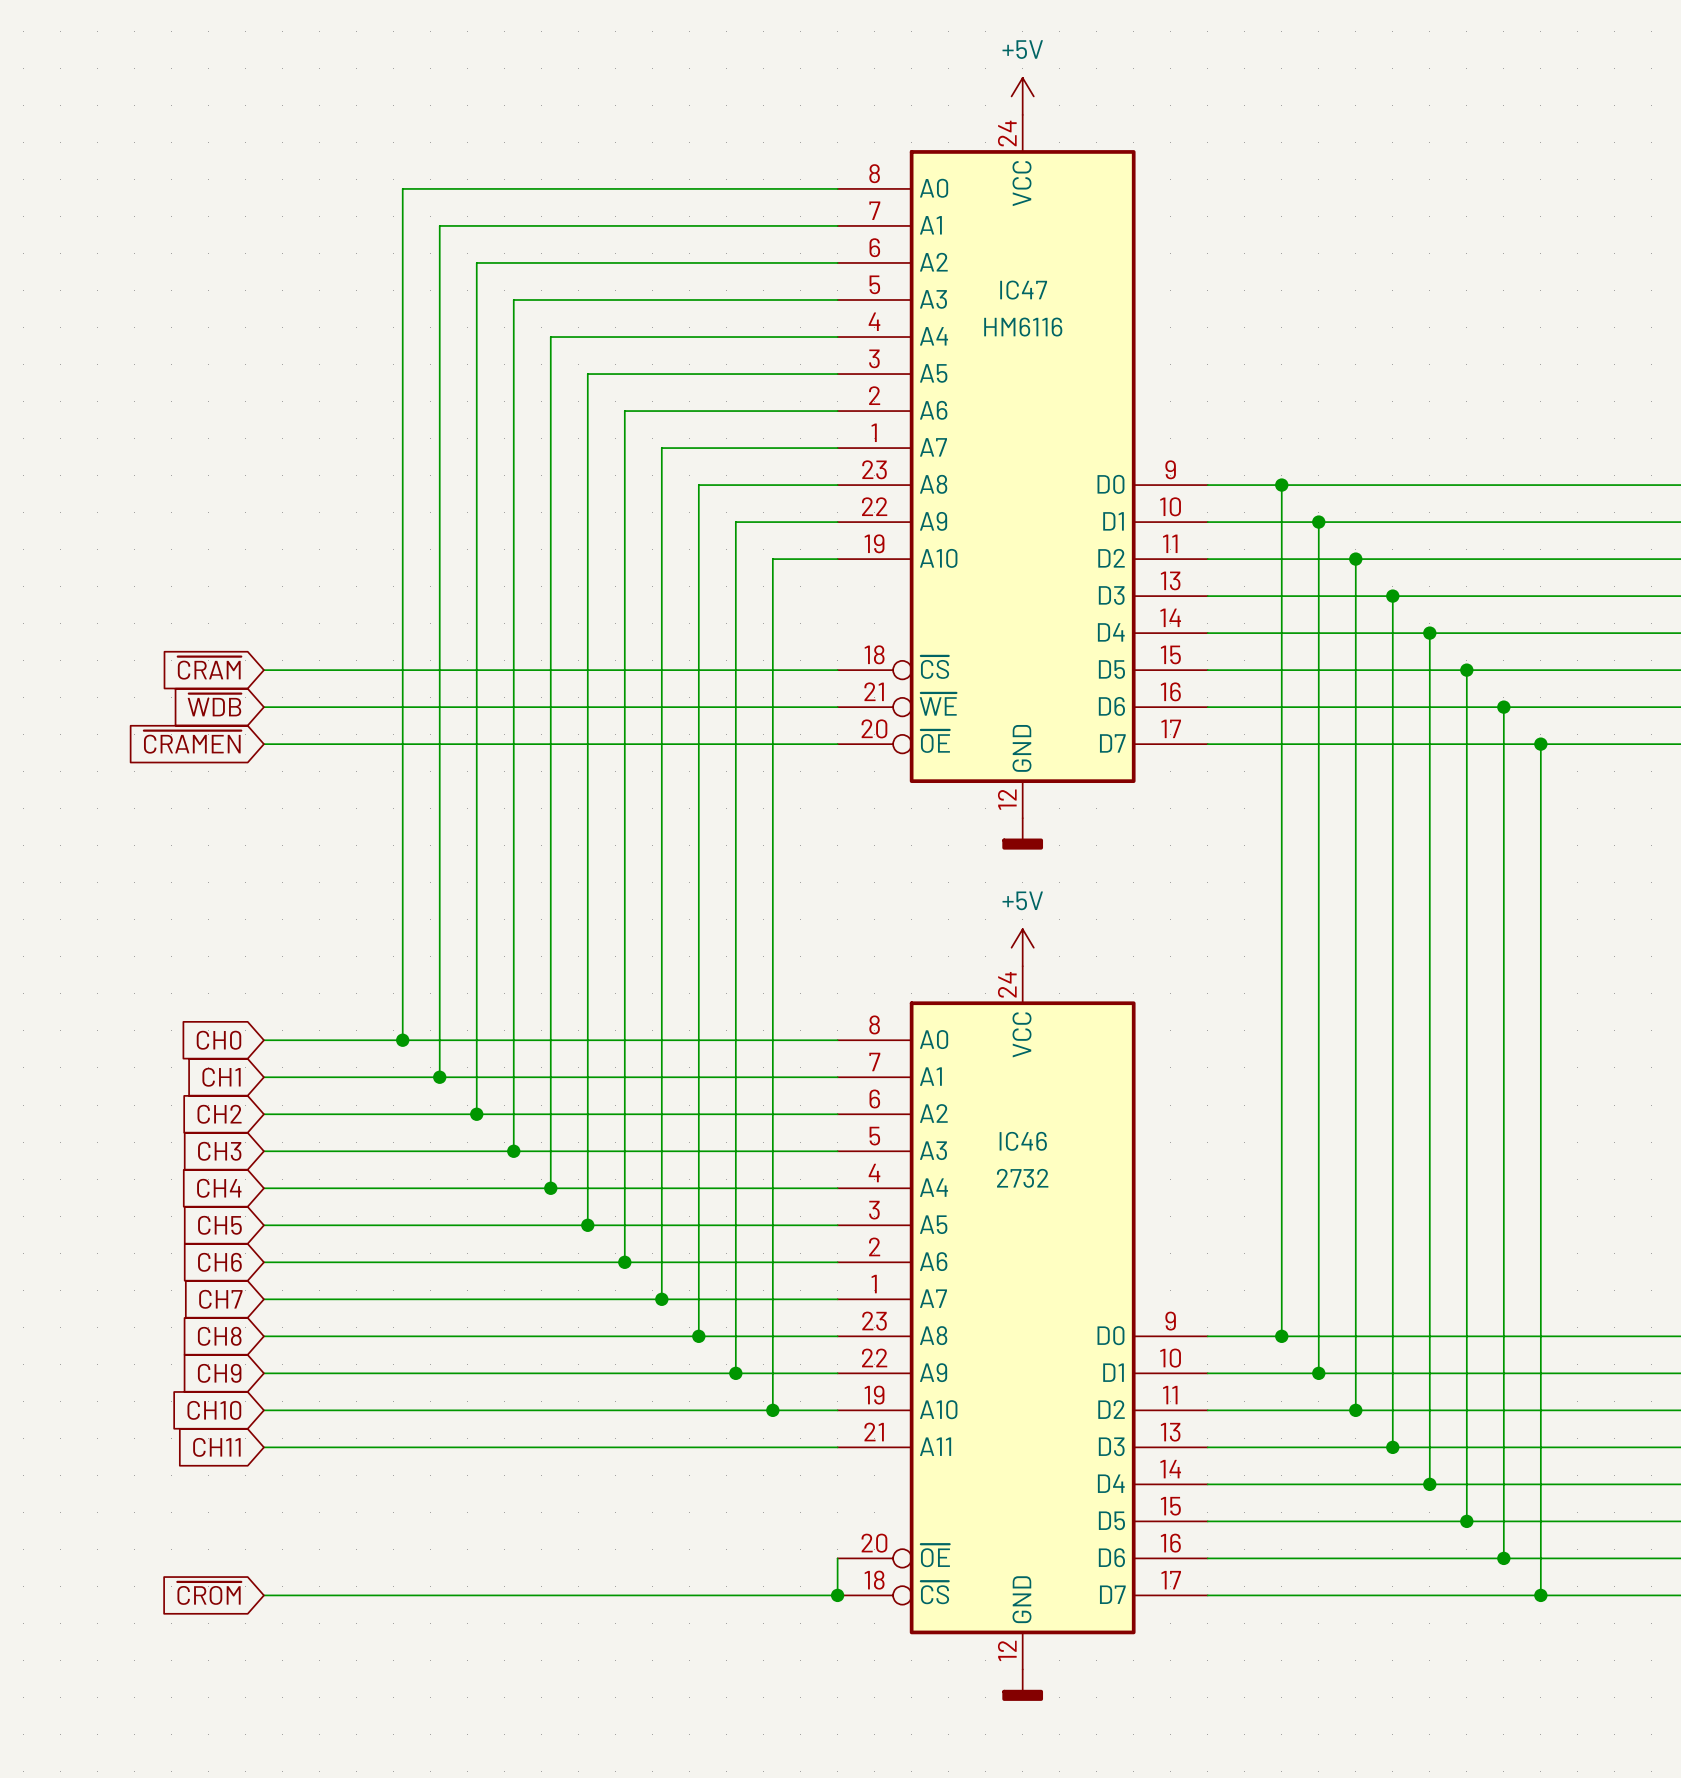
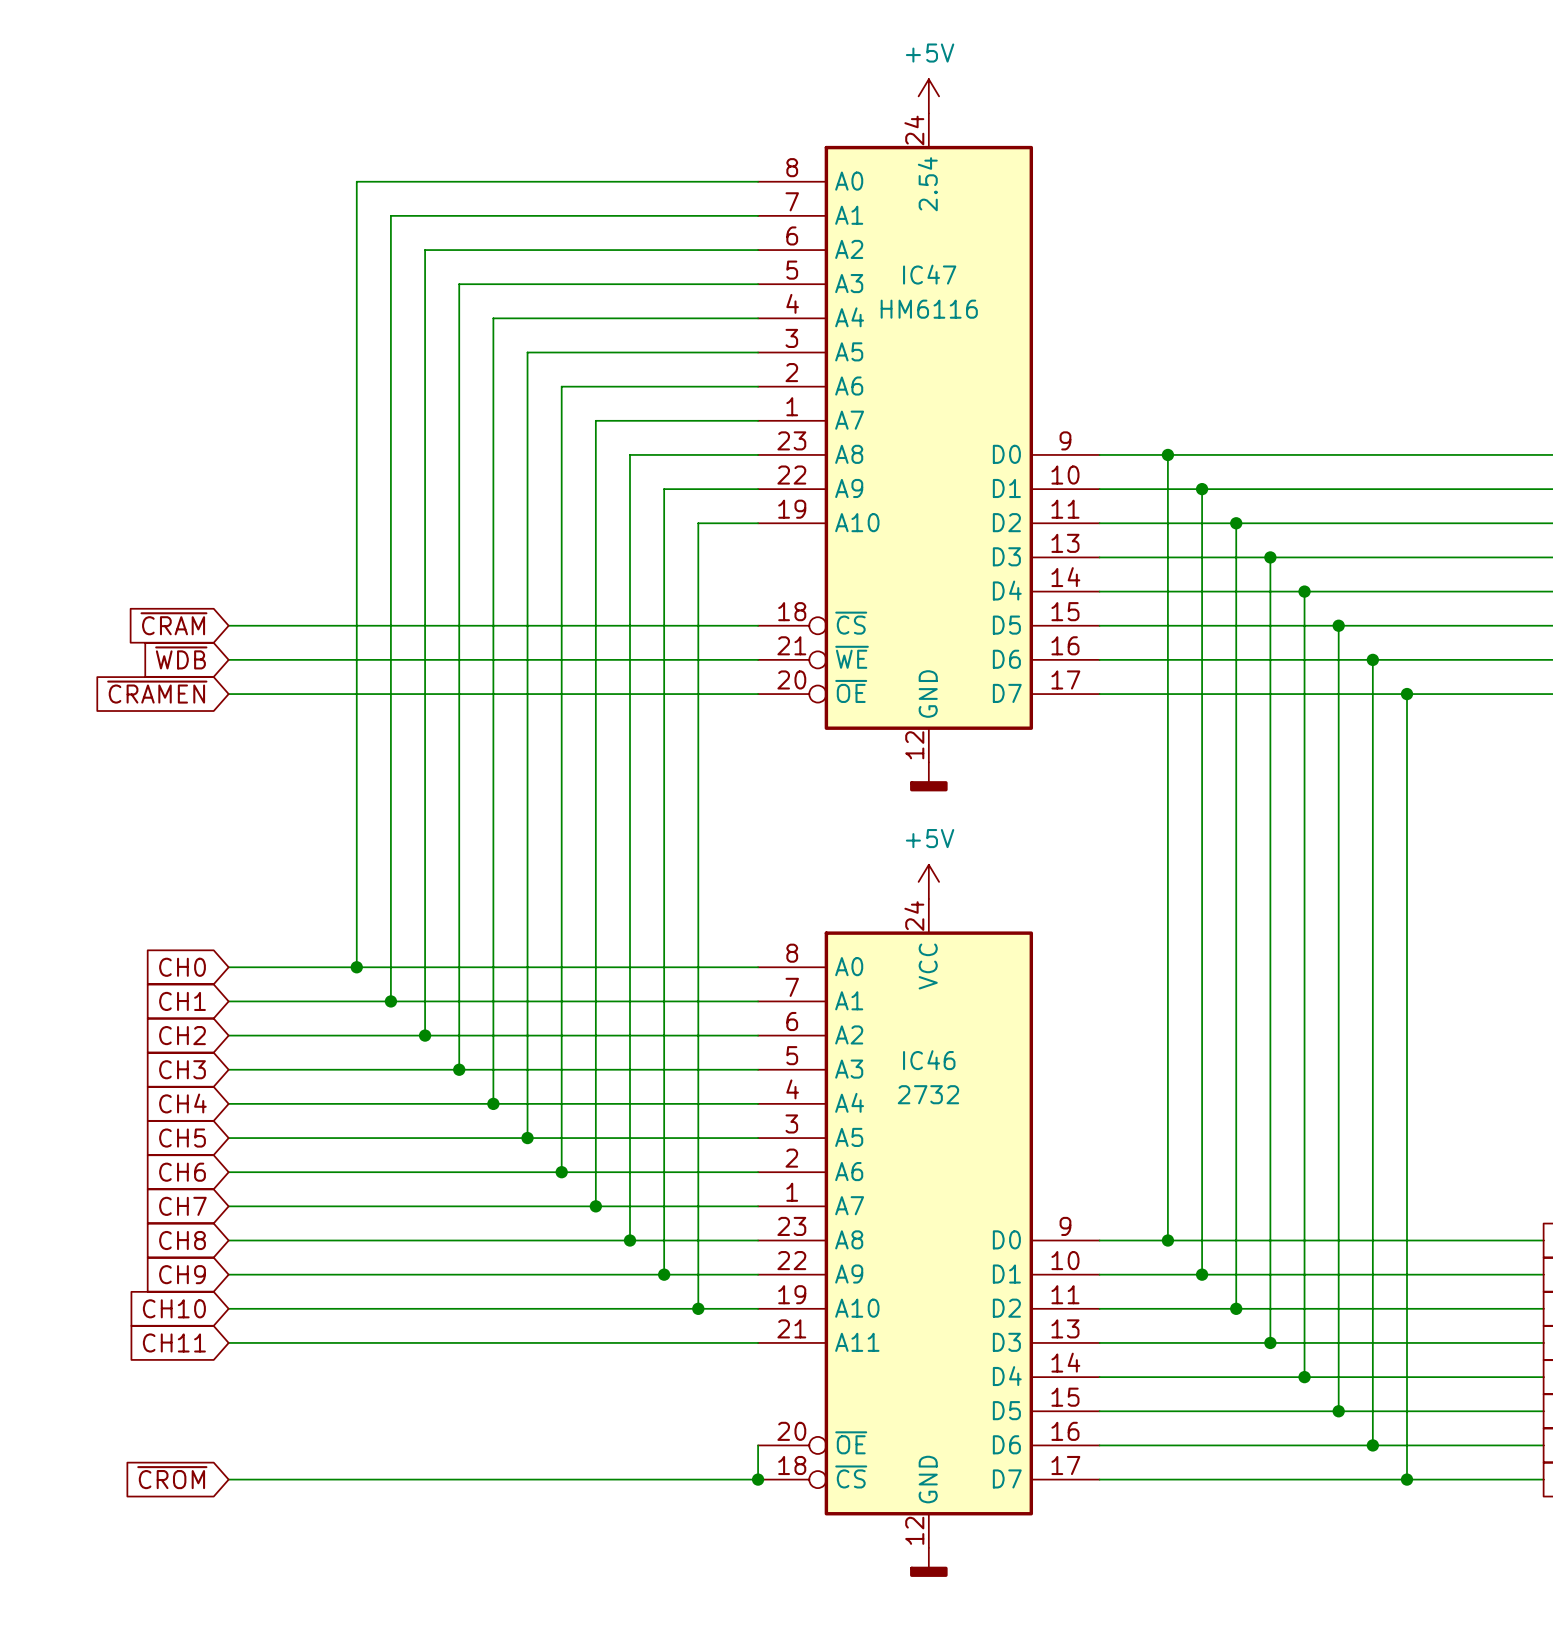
IC47 pin name: VCC (1021, 183) -> 2.54 (927, 184)

